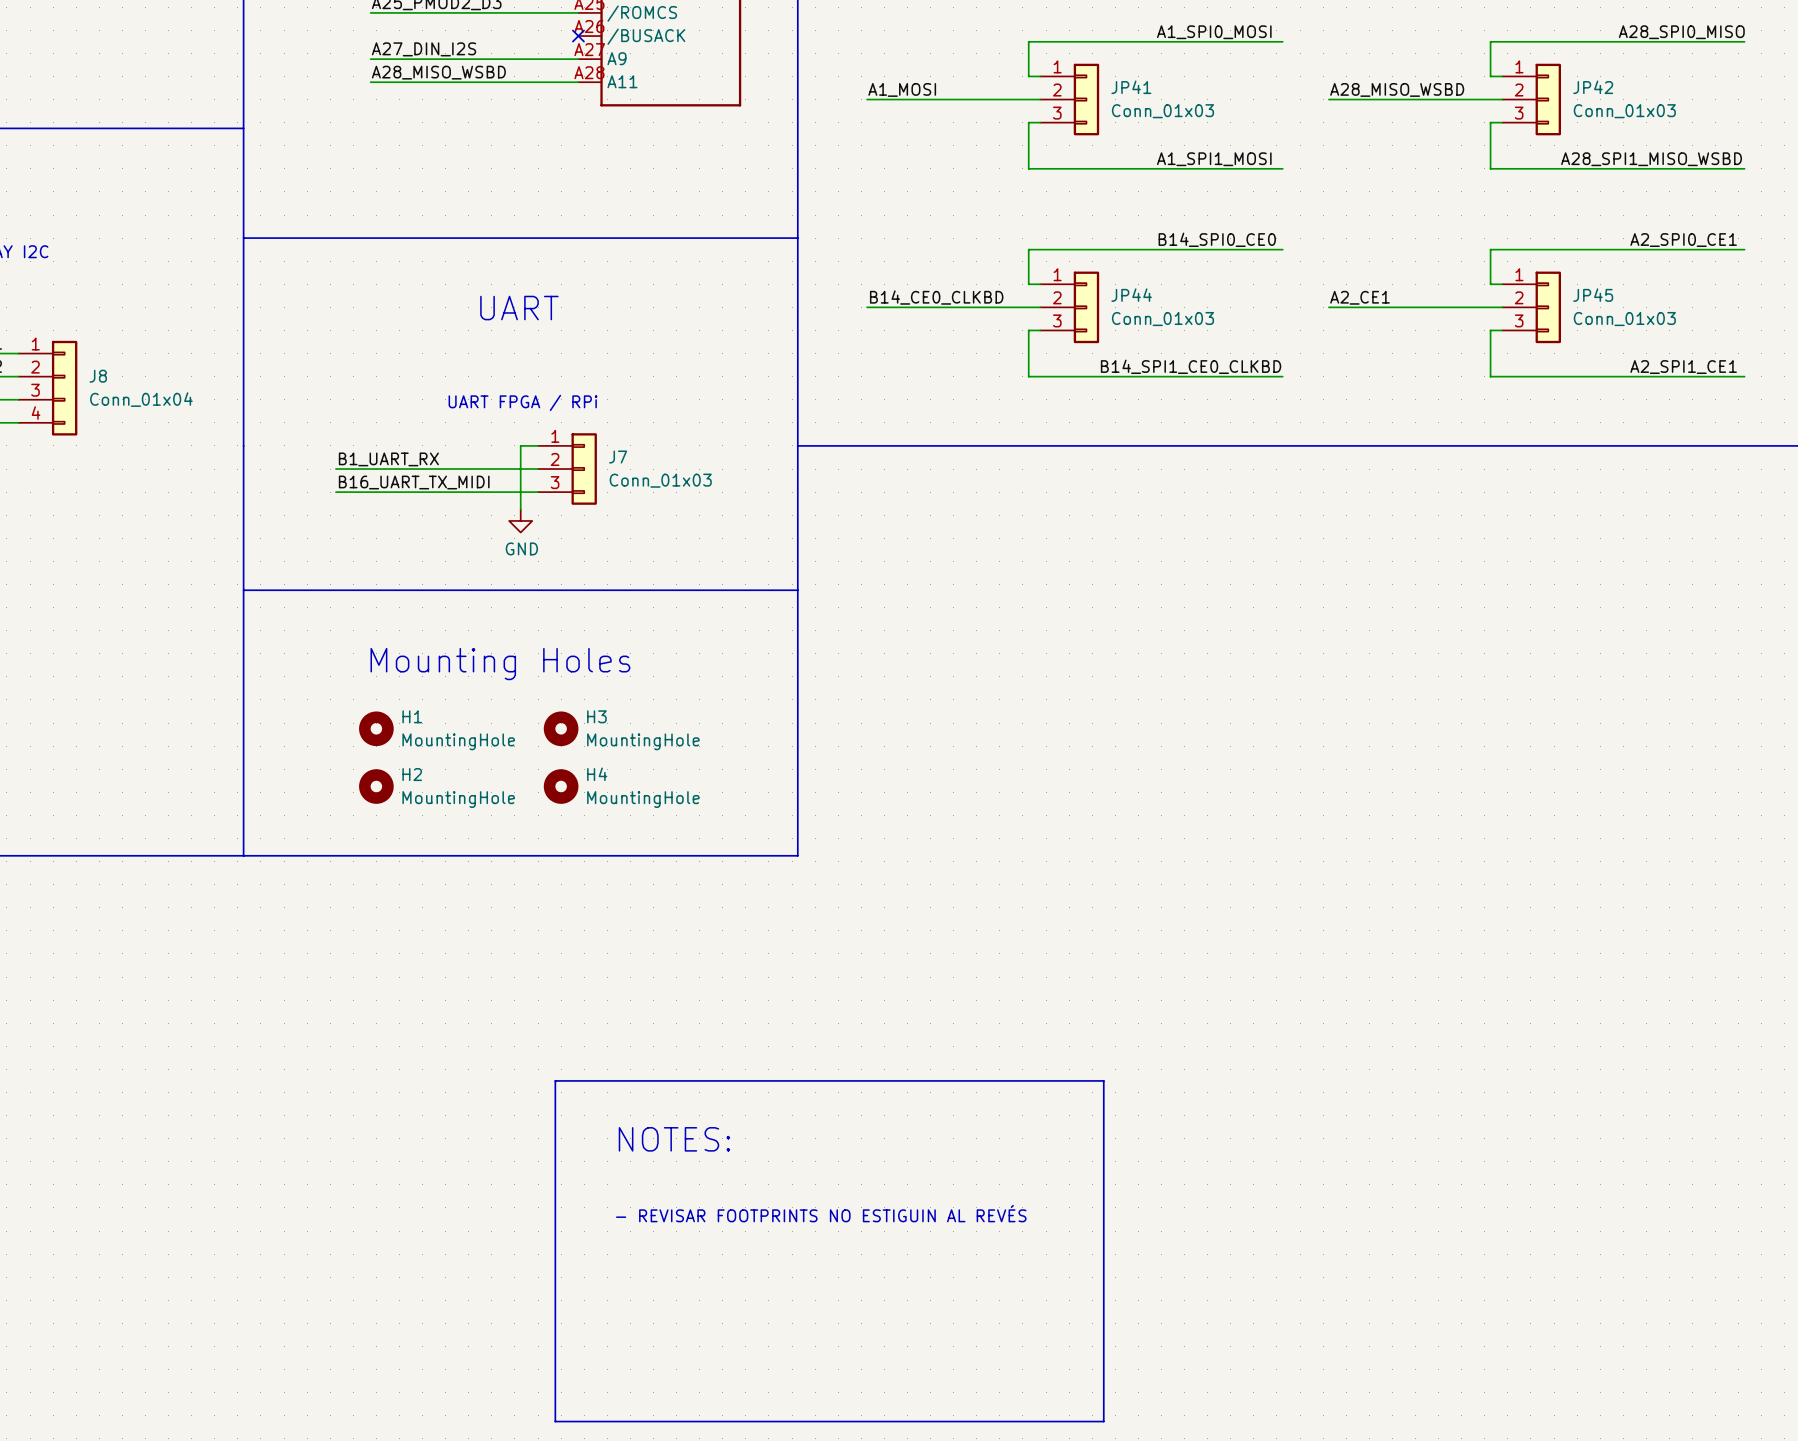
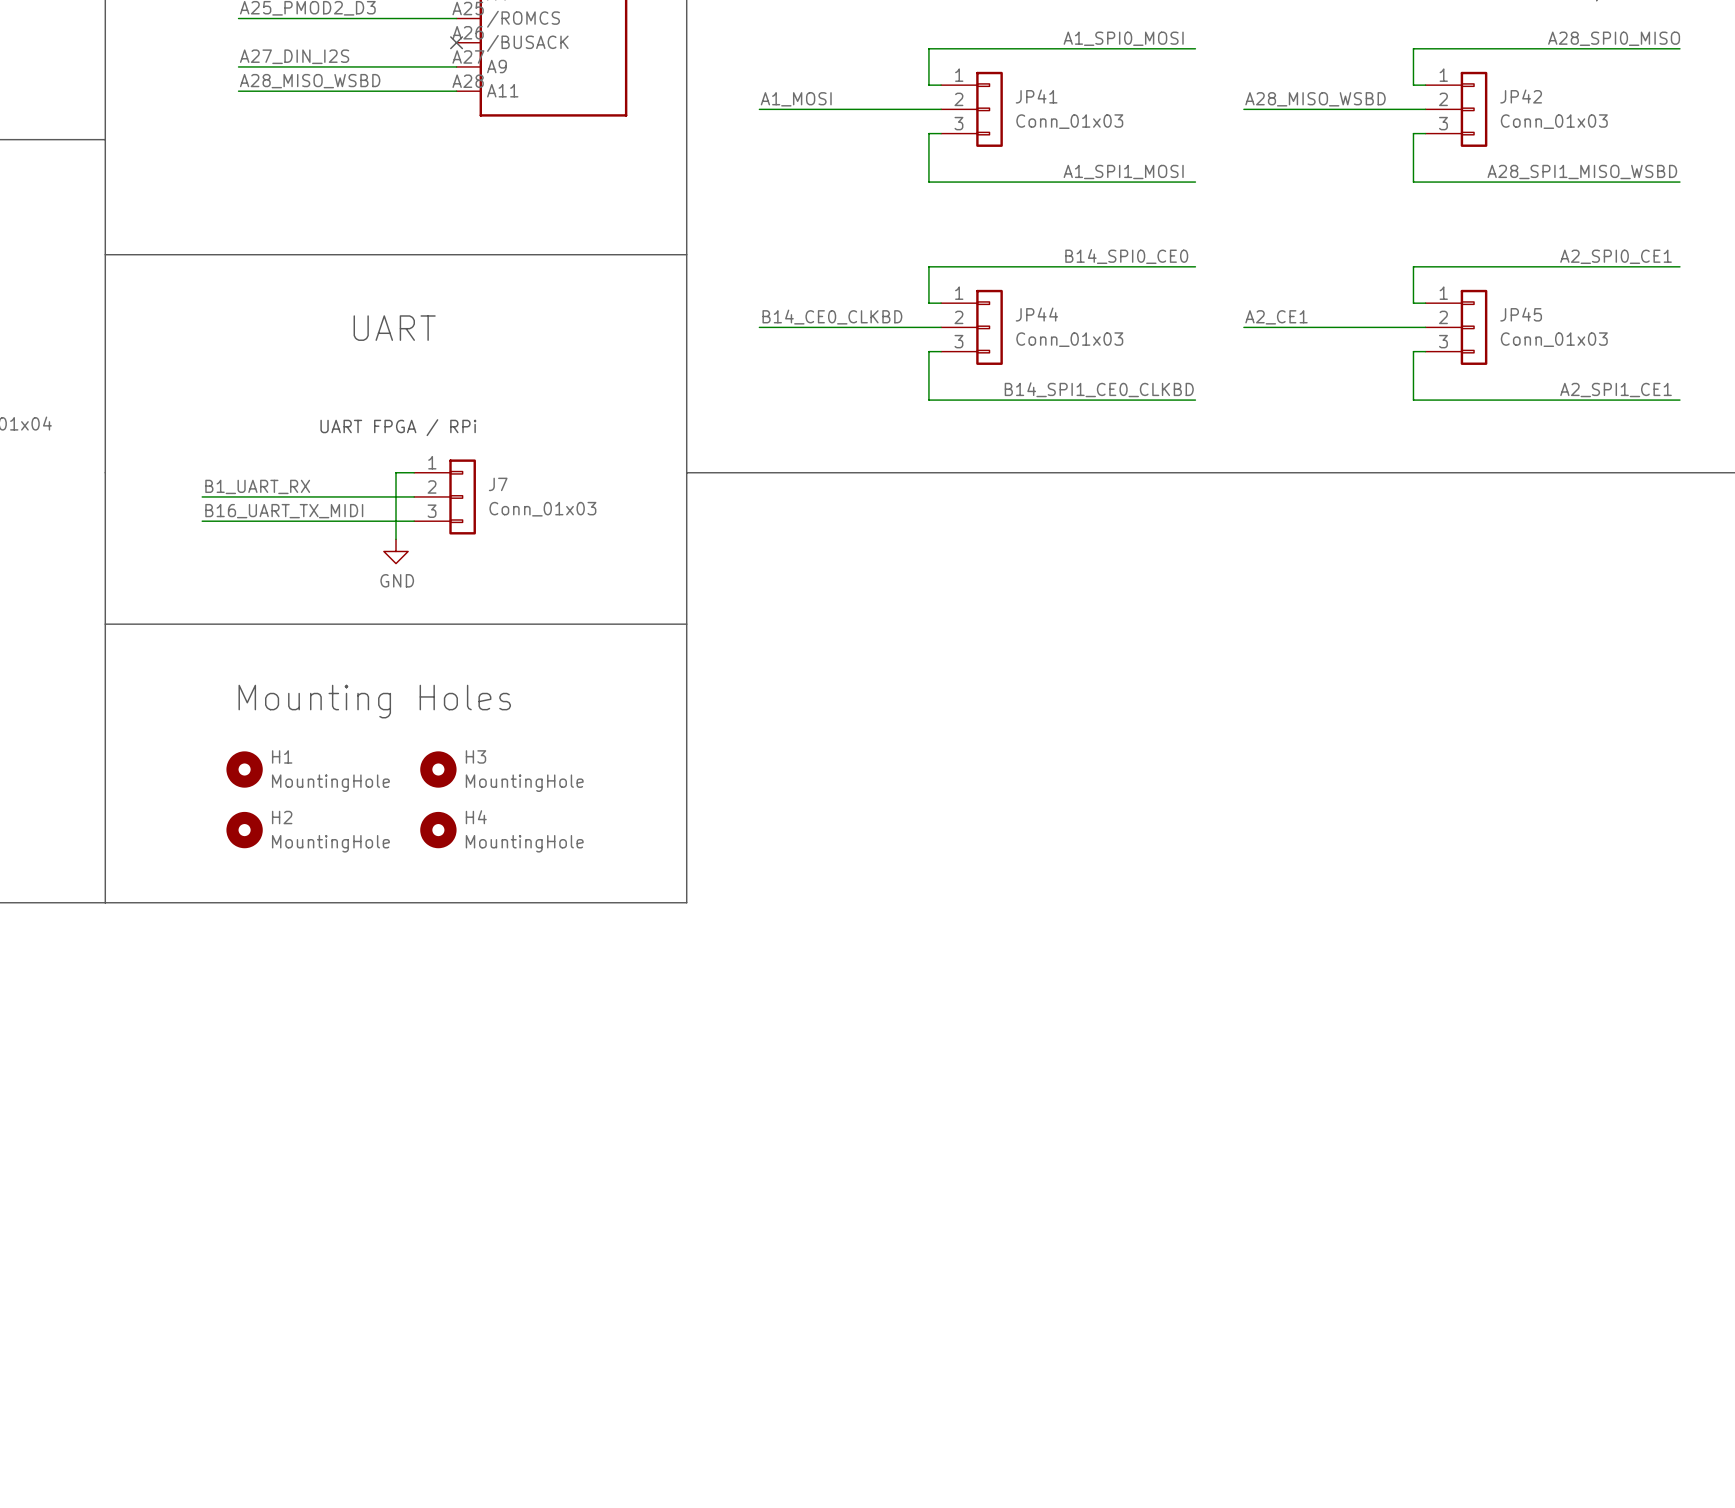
line: (555, 1080) (1103, 1080) (1103, 1421) (555, 1421) (555, 1080) -> none
text: NOTES: (674, 1139) -> none
text: - REVISAR FOOTPRINTS NO ESTIGUIN AL REVÉS (821, 1213) -> none

